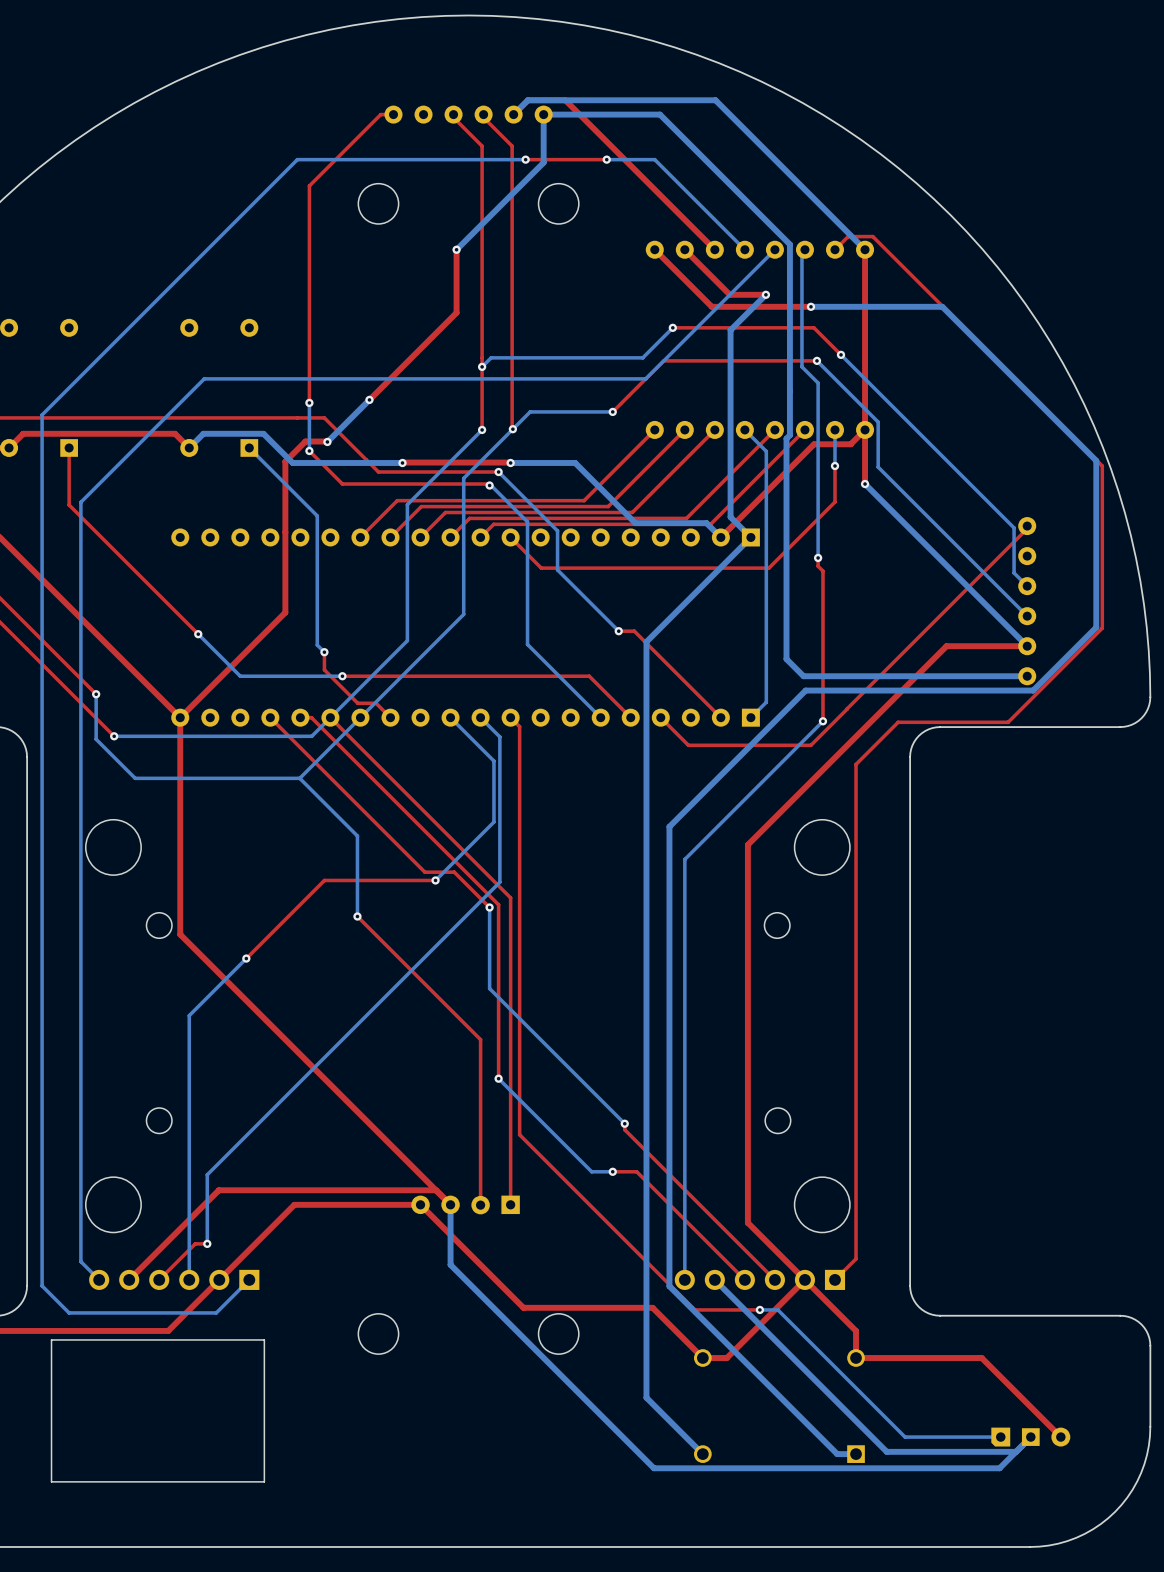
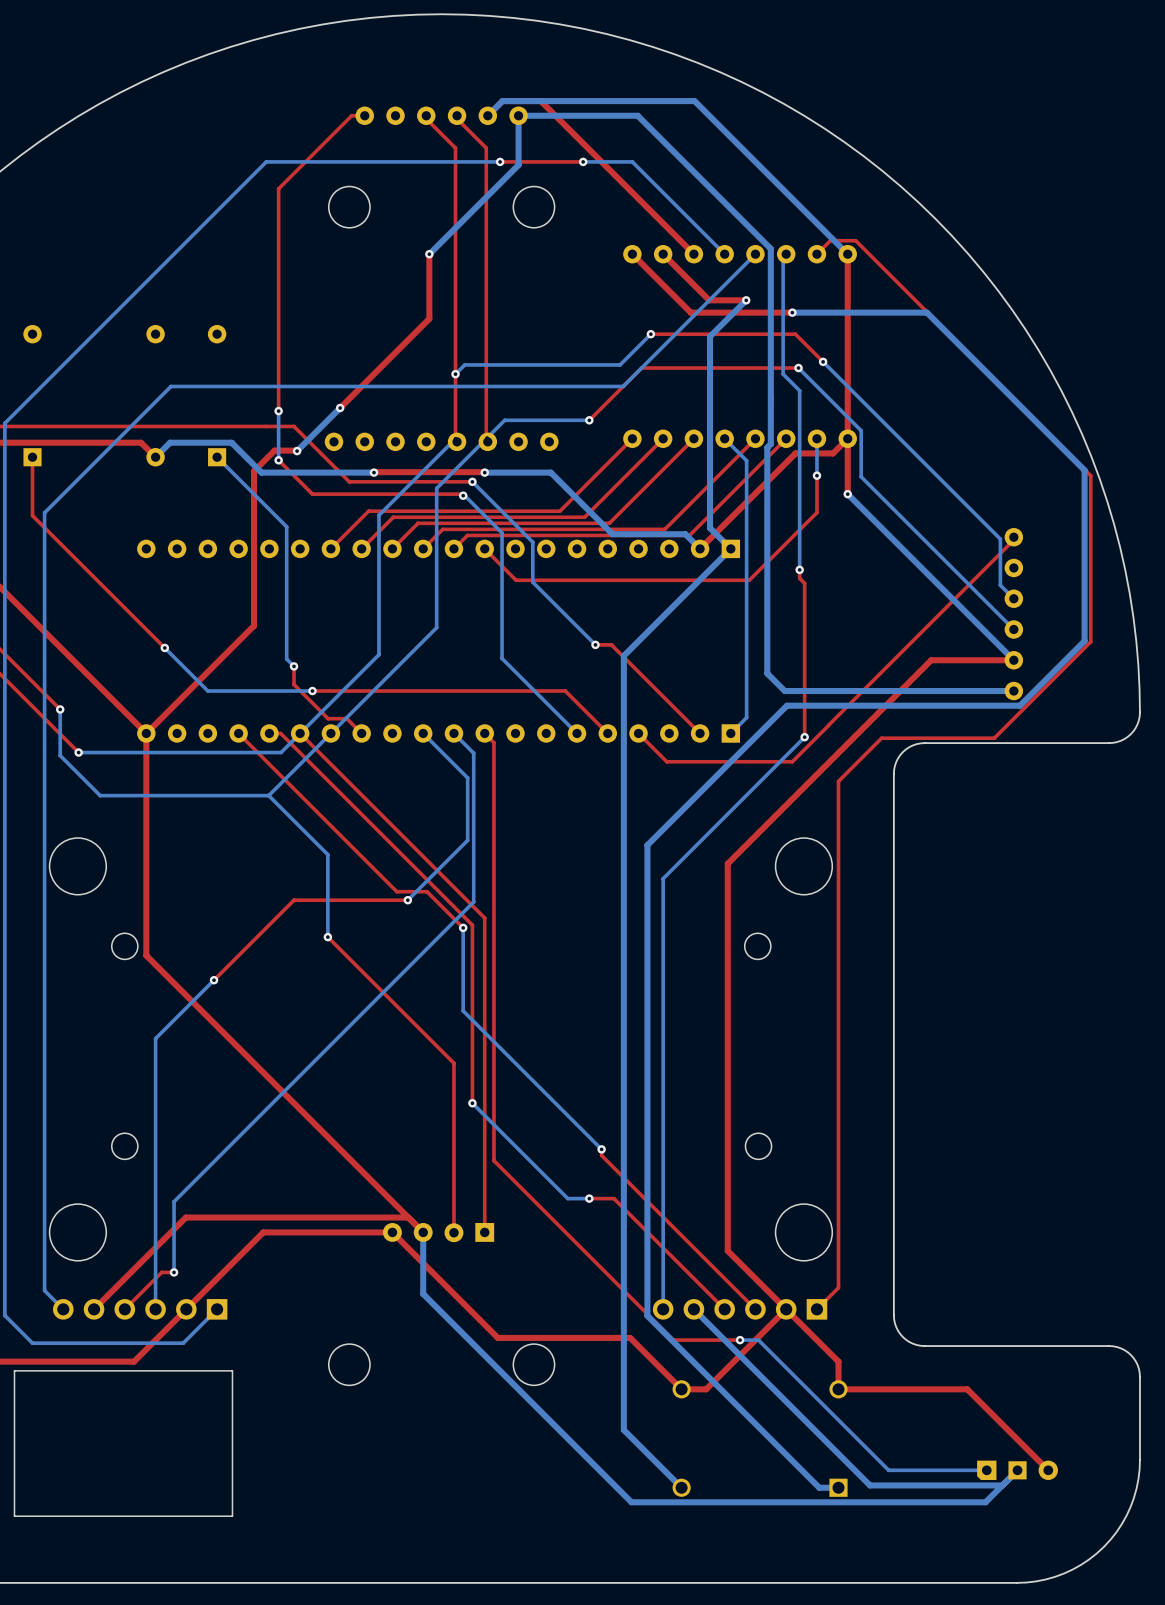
part: none -> (441, 441)

